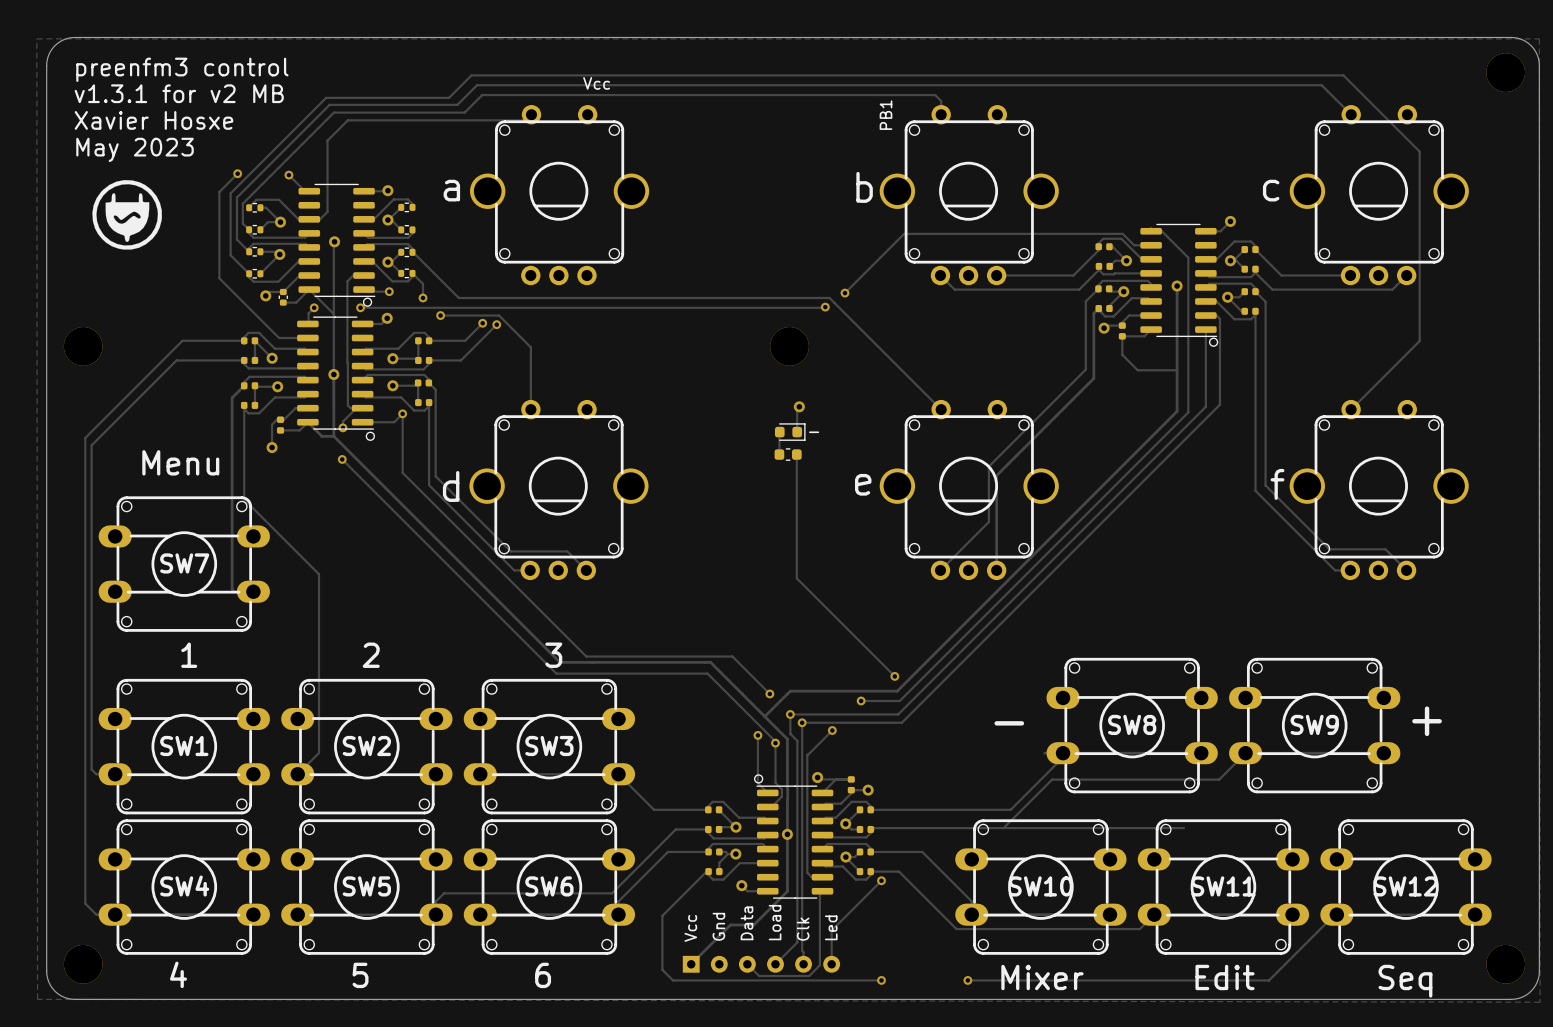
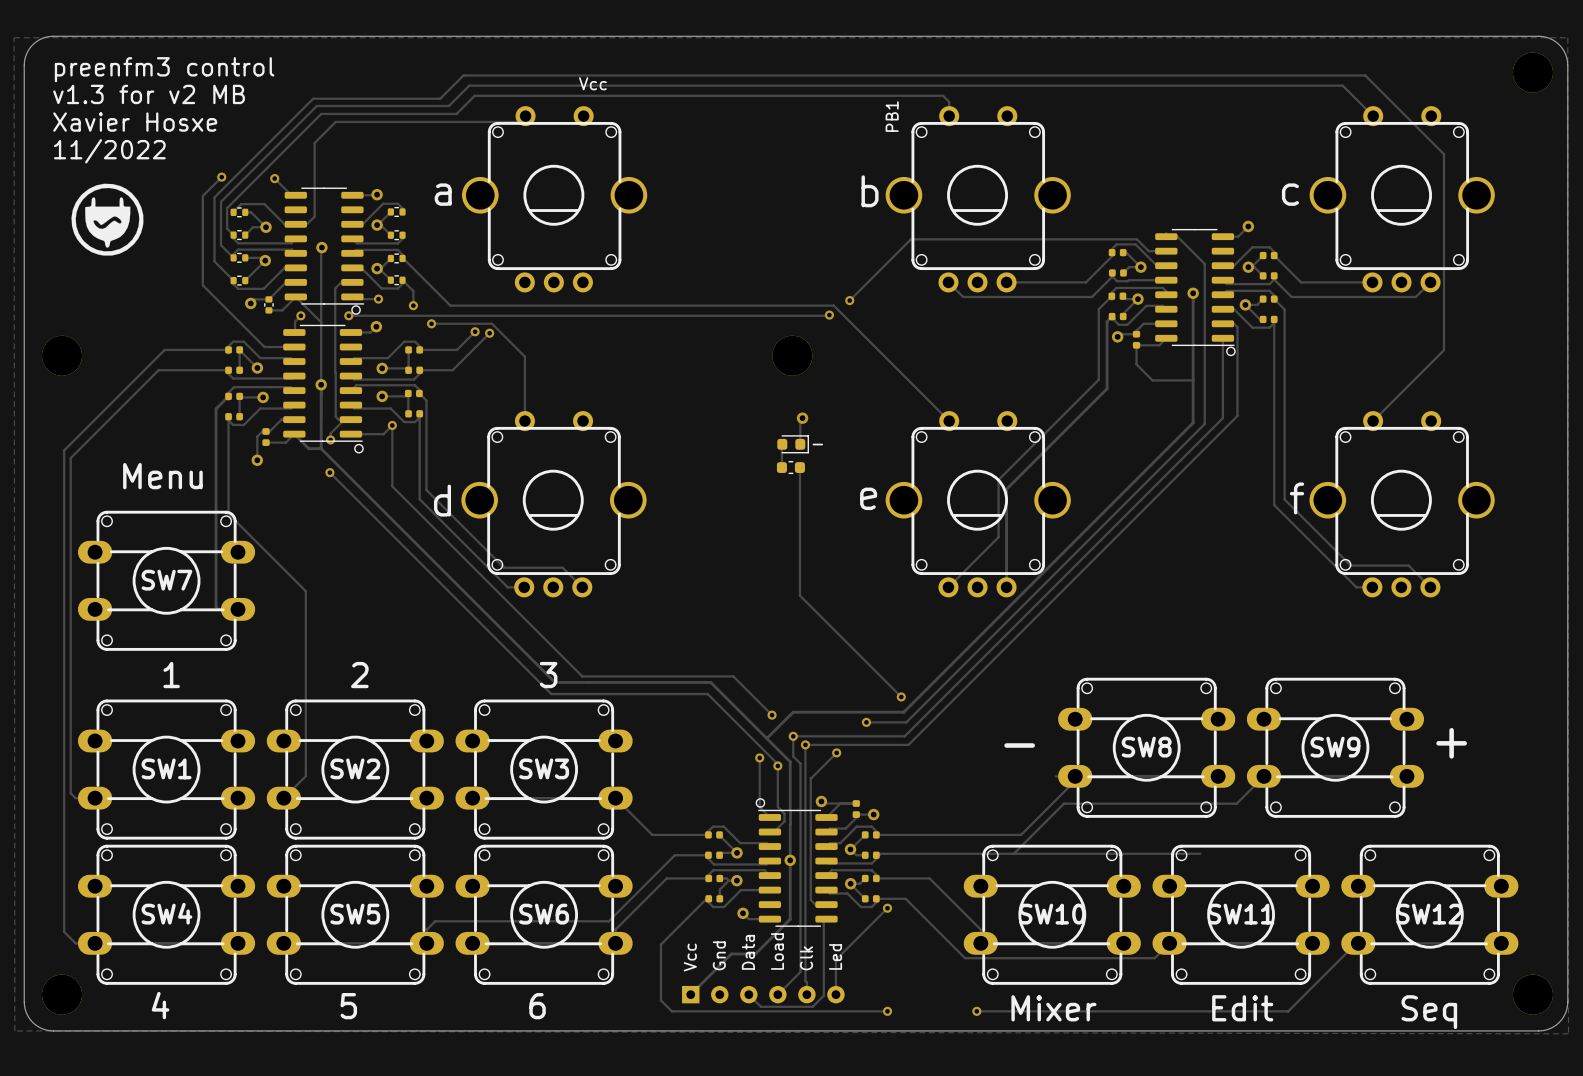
text: v1.3.1 for v2 MB (179, 93) -> v1.3 for v2 MB (149, 94)
text: May 2023 (135, 149) -> 11/2022 (109, 151)

